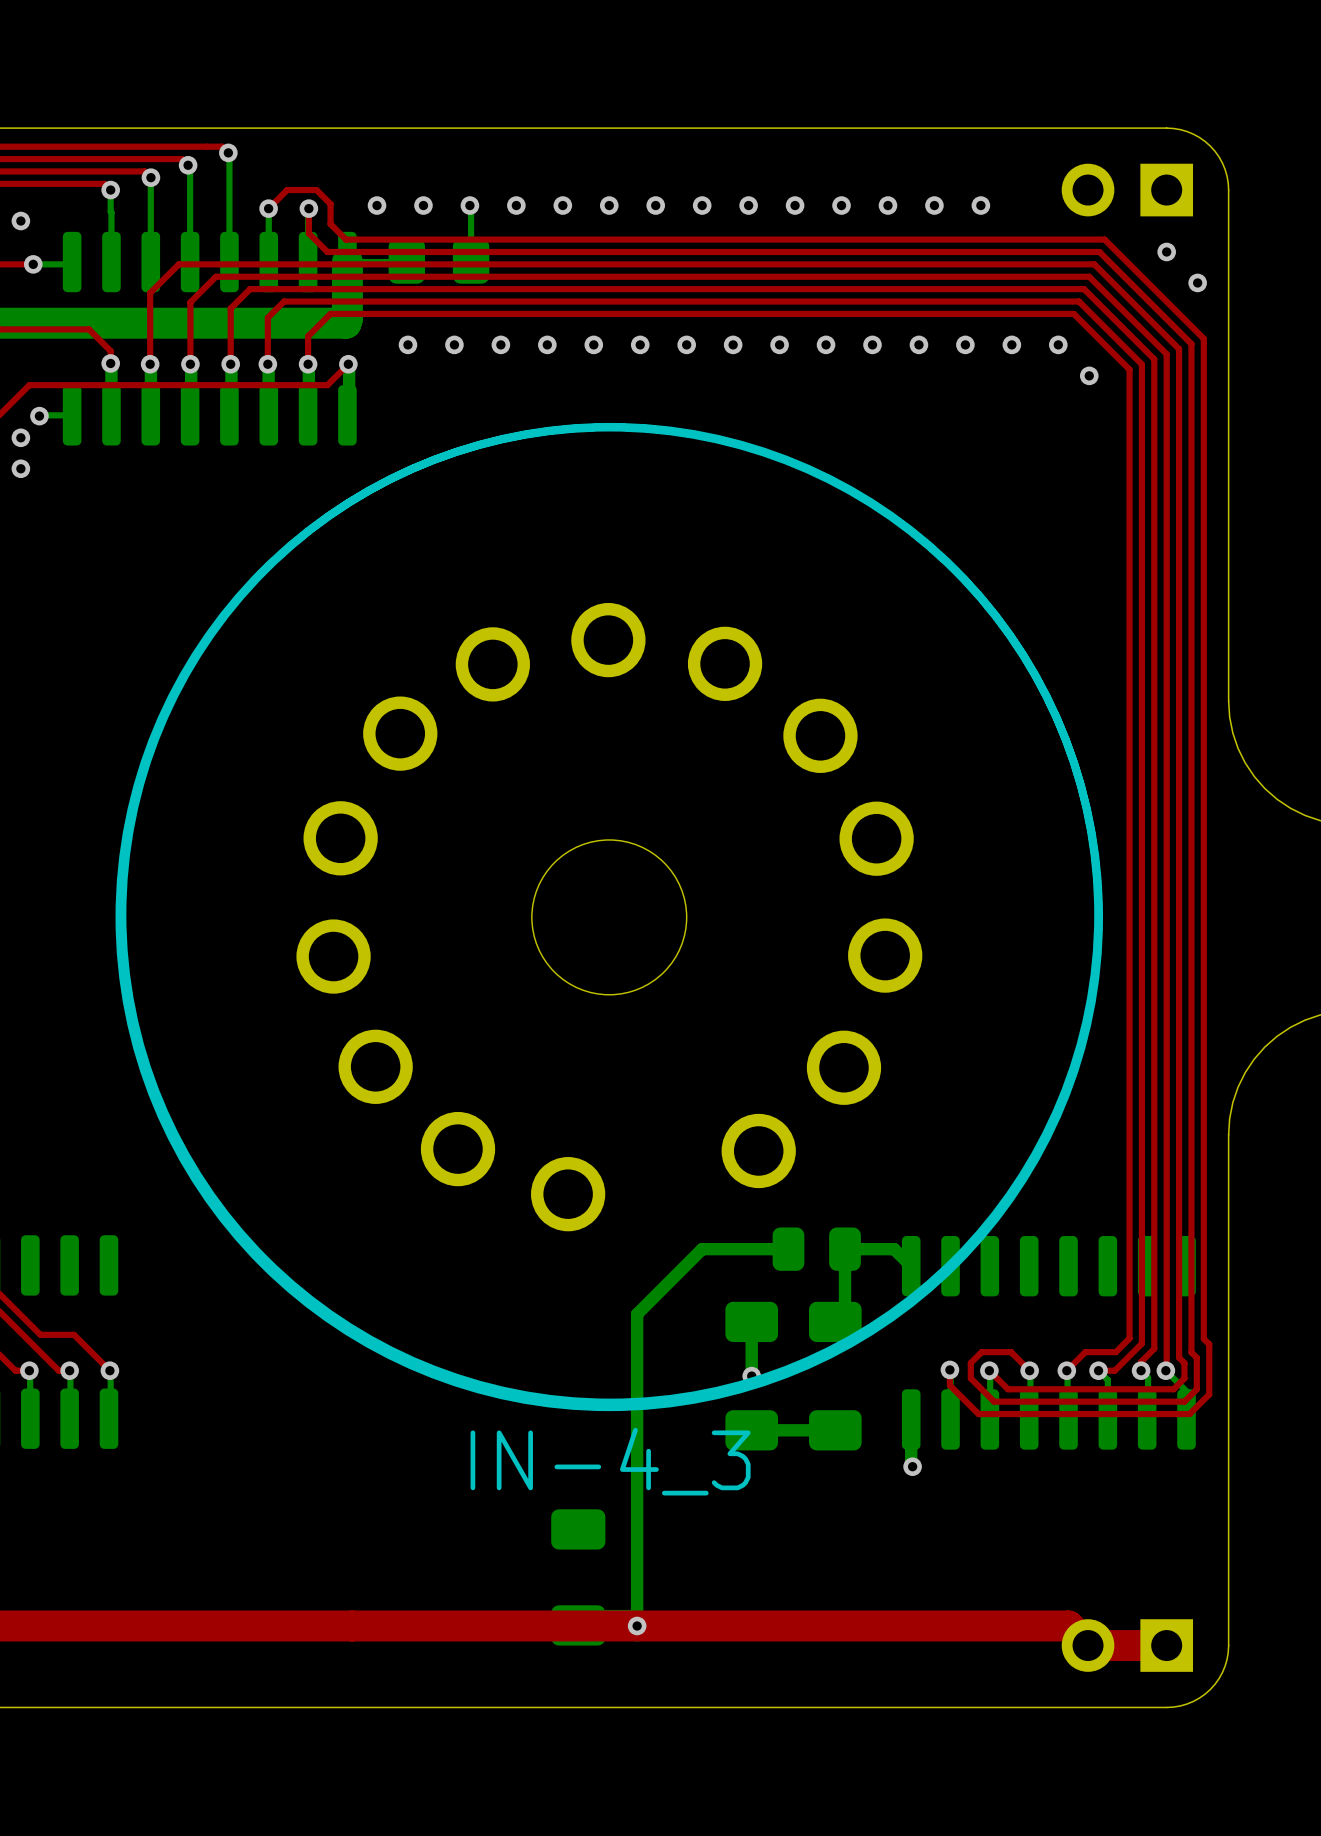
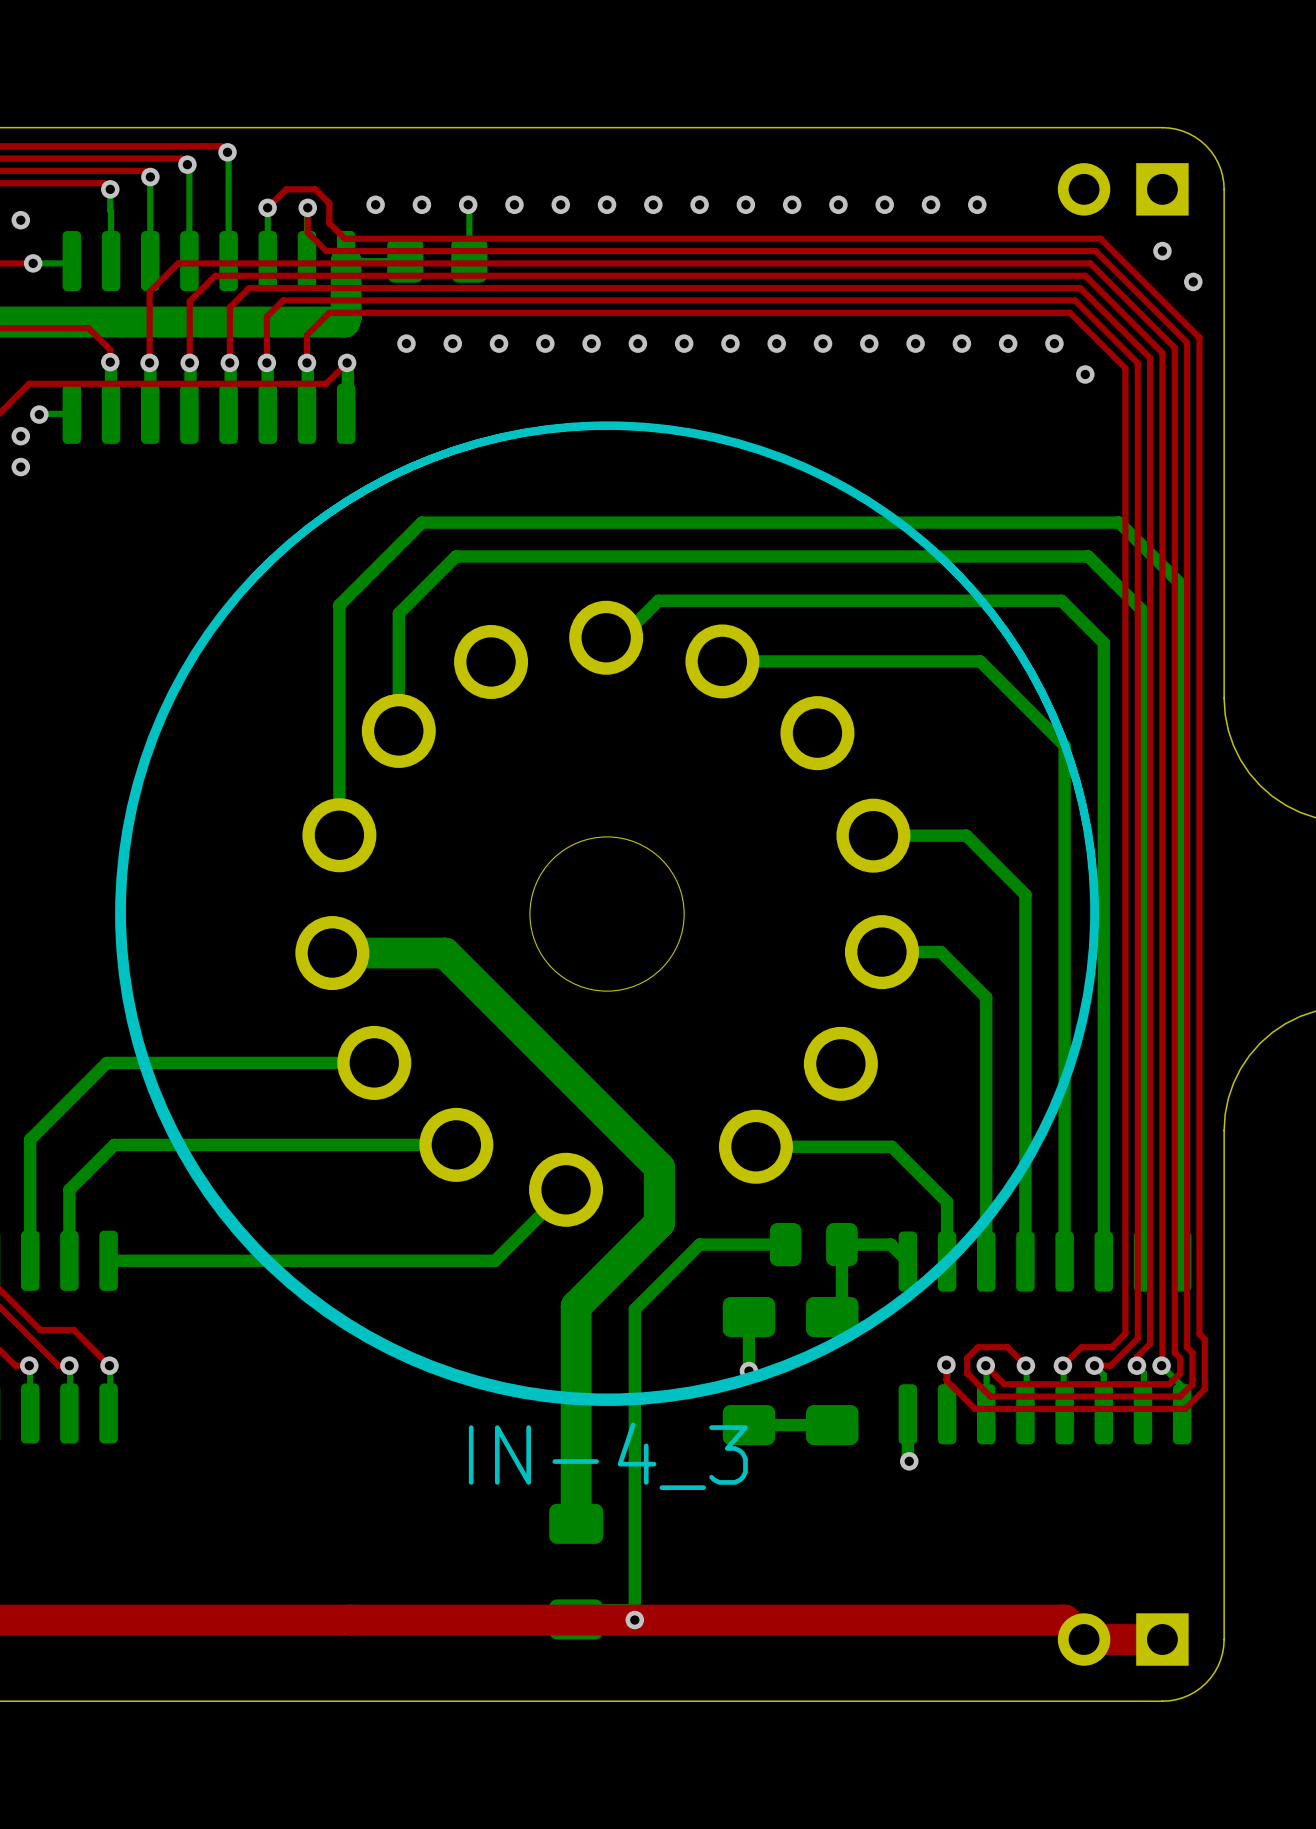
bottom track: none -> (606, 637) (621, 637) (658, 600) (1061, 600) (1103, 642) (1103, 1261)
bottom track: none -> (722, 661) (980, 661) (1064, 745) (1064, 1261)
bottom track: none -> (398, 730) (398, 613) (455, 556) (1088, 556) (1142, 611) (1142, 1261)
bottom track: none -> (339, 835) (339, 605) (421, 522) (1119, 522) (1182, 585) (1182, 1261)
bottom track: none -> (873, 835) (966, 835) (1025, 894) (1025, 1261)
bottom track: none -> (881, 952) (940, 952) (986, 997) (986, 1261)
bottom track: none -> (332, 953) (445, 953) (659, 1167) (659, 1222) (576, 1306) (576, 1523)
bottom track: none -> (374, 1062) (106, 1062) (30, 1139) (30, 1260)
bottom track: none -> (456, 1144) (114, 1144) (69, 1189) (69, 1260)
bottom track: none -> (755, 1146) (891, 1146) (947, 1202) (947, 1261)
bottom track: none -> (566, 1189) (495, 1260) (108, 1260)

